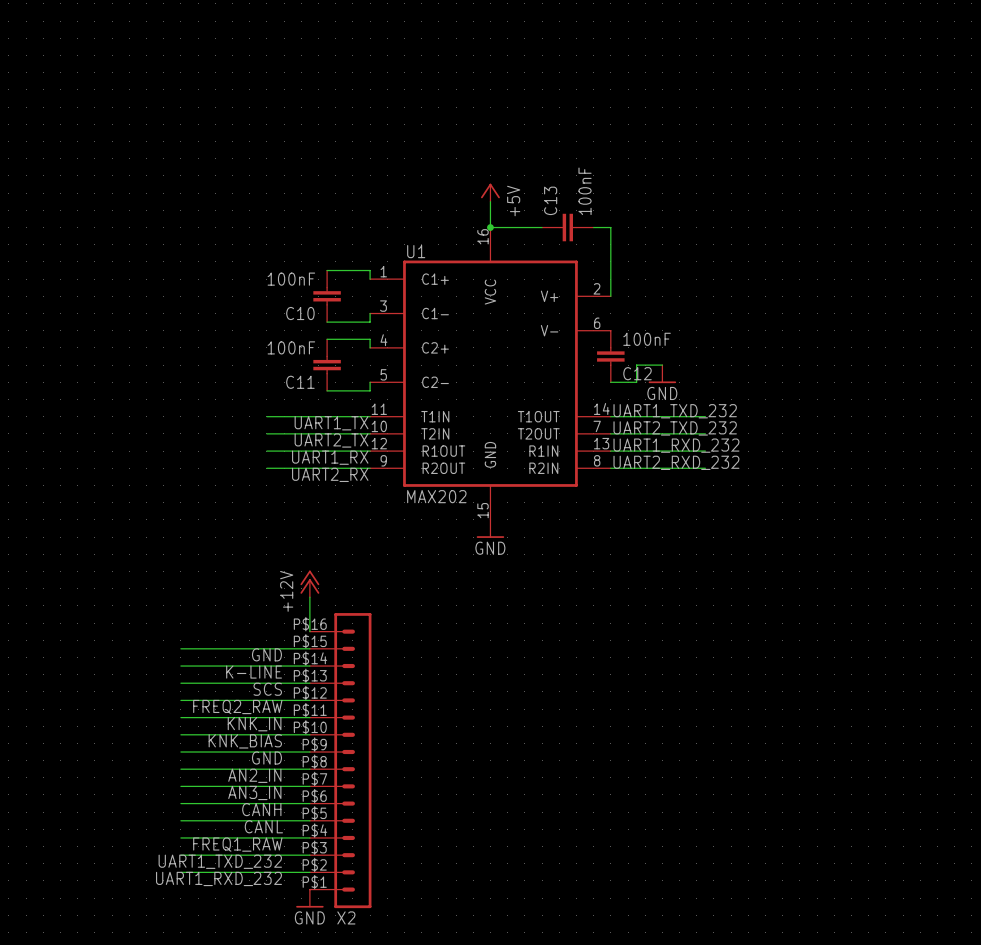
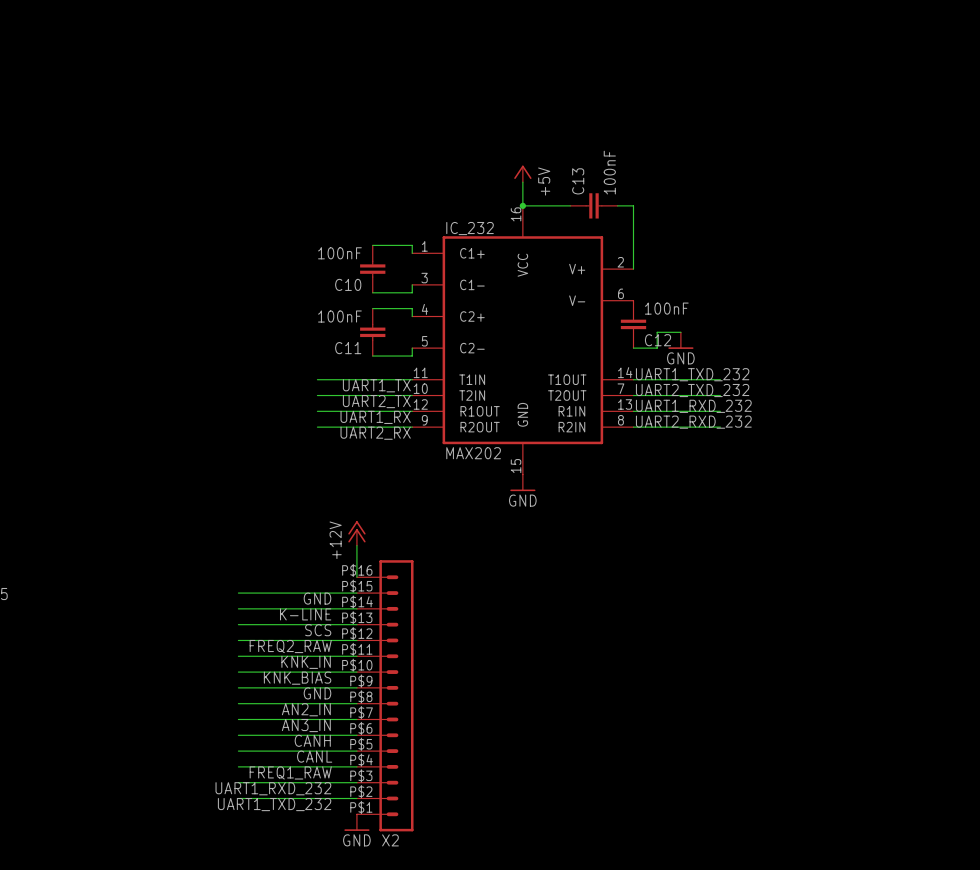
U1 name: U1 (416, 251) -> IC_232 (470, 228)
label: UART1_TXD_232 (220, 861) -> UART1_RXD_232 (273, 788)
label: UART1_RXD_232 (218, 878) -> UART1_TXD_232 (274, 804)

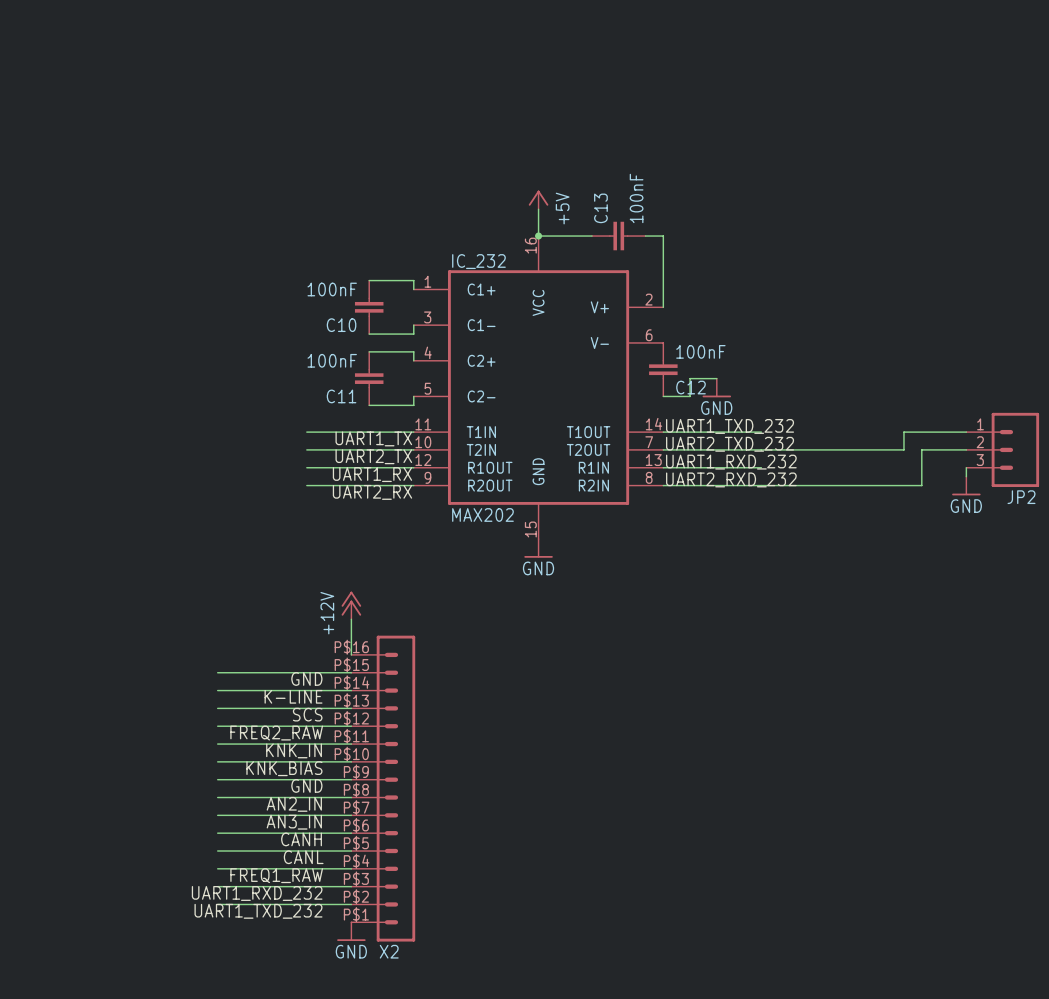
wire: none -> (966, 432) (903, 432) (903, 449) (761, 449)
wire: none -> (966, 449) (921, 449) (921, 485) (761, 485)
JP2: none -> (1002, 449)
wire: none -> (966, 467) (966, 476)
power symbol: none -> GND (966, 486)

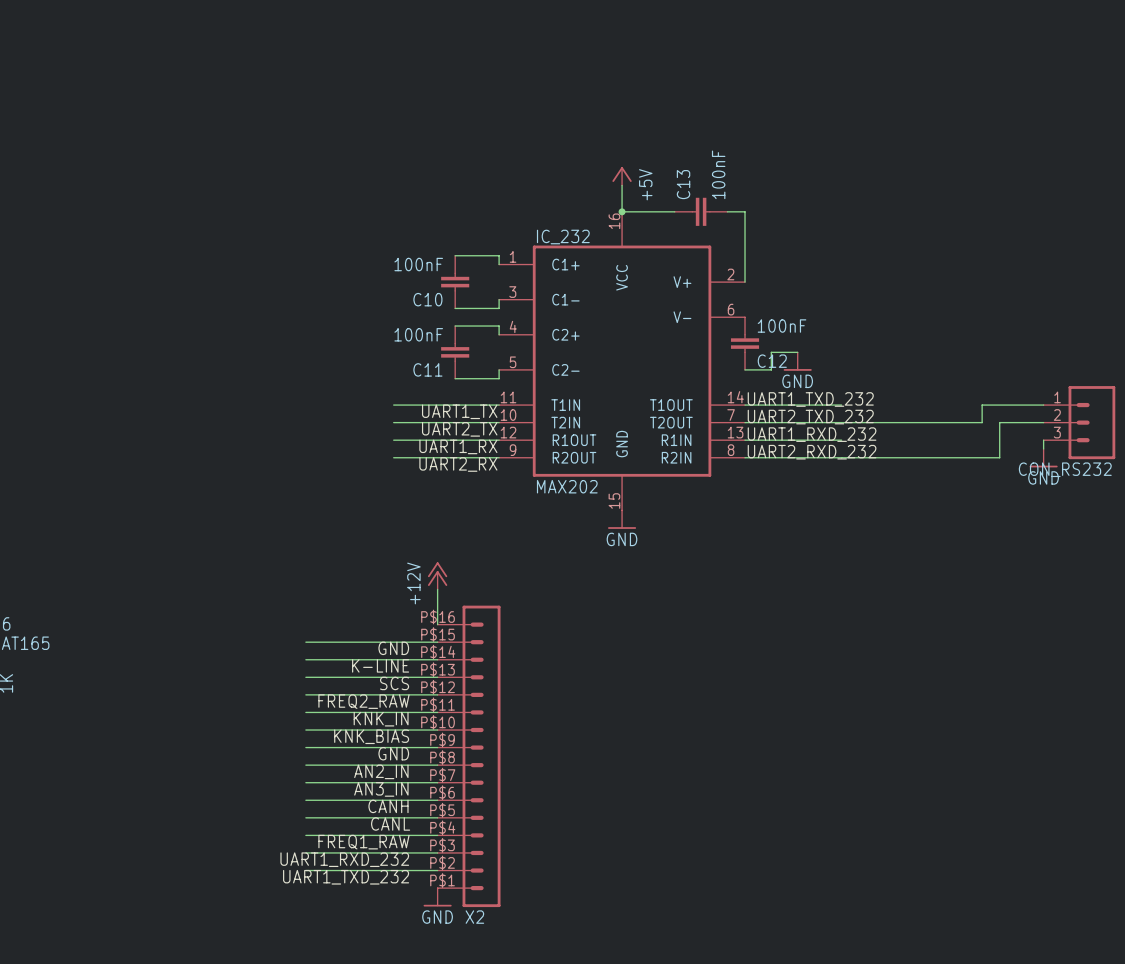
JP2 name: JP2 (1021, 497) -> CON_RS232 (1065, 469)

